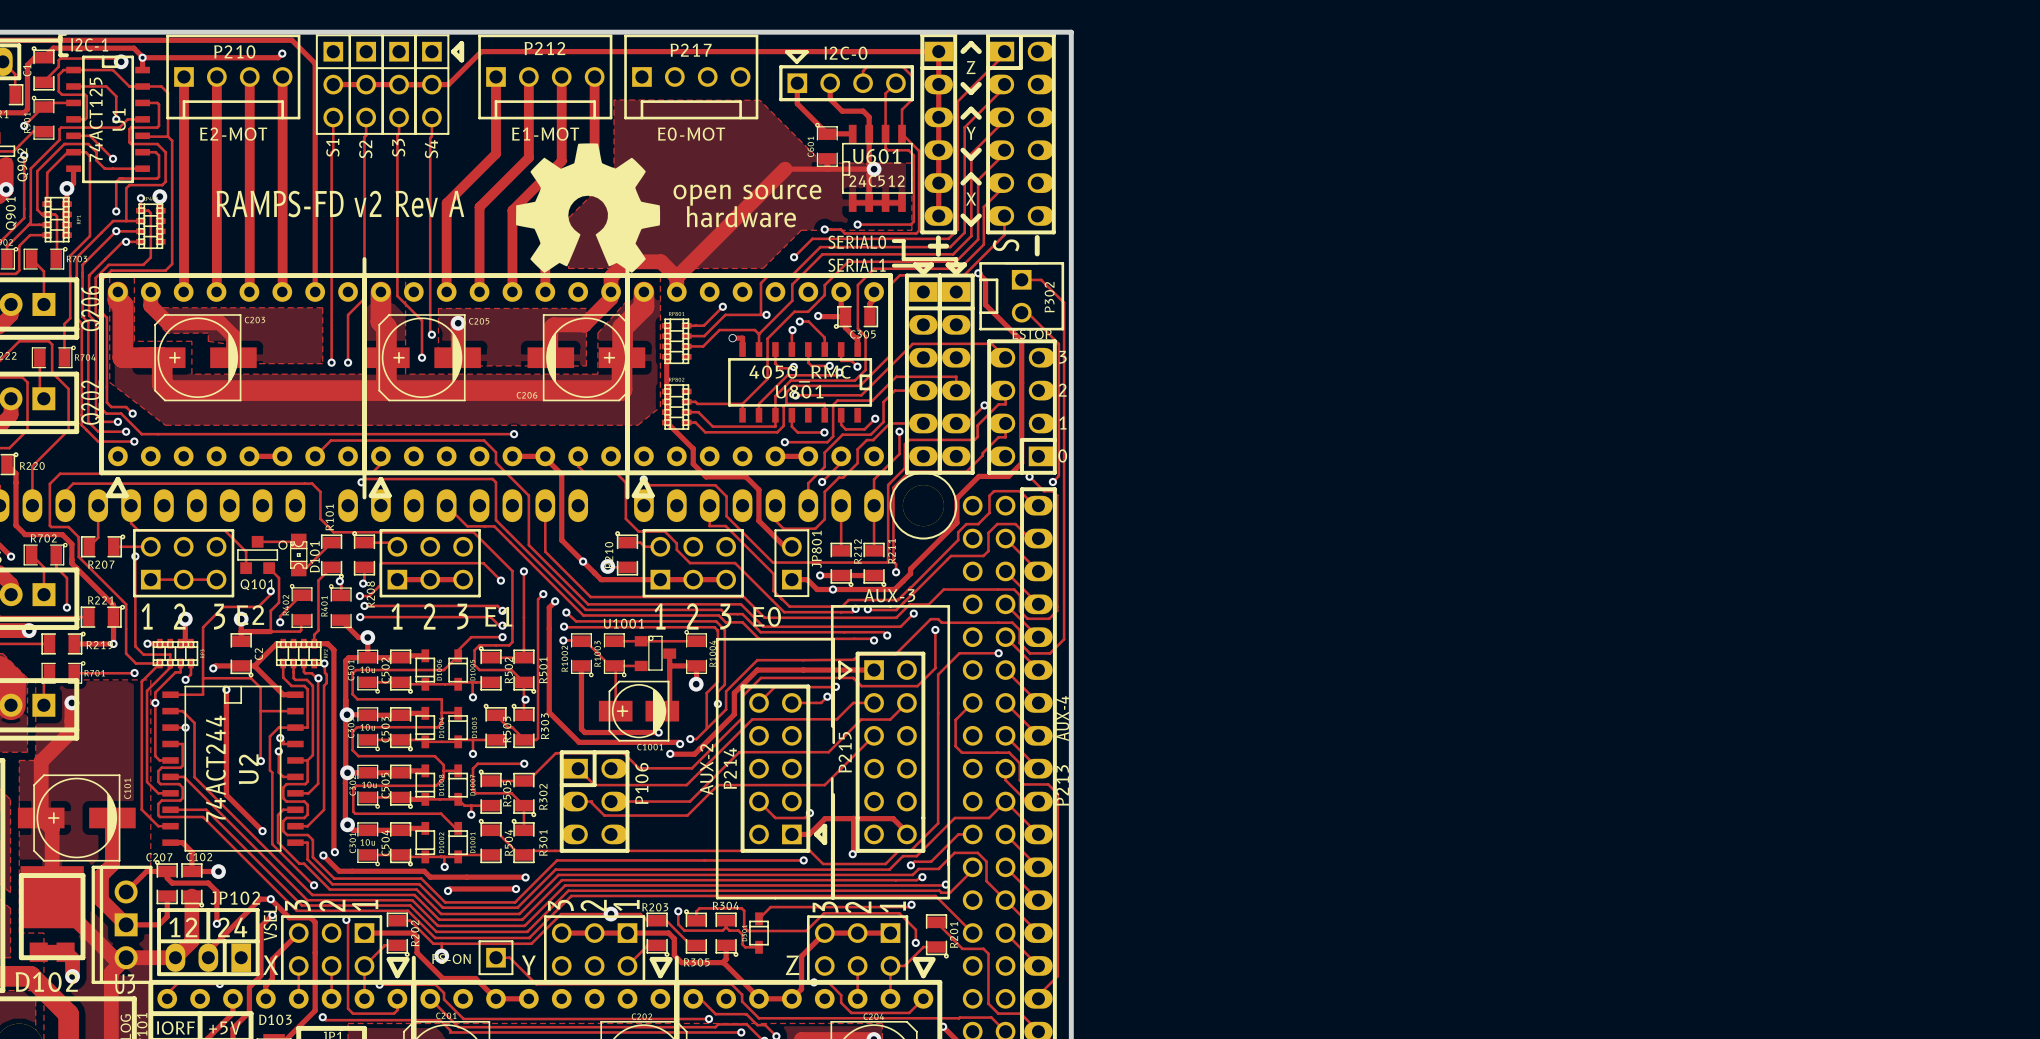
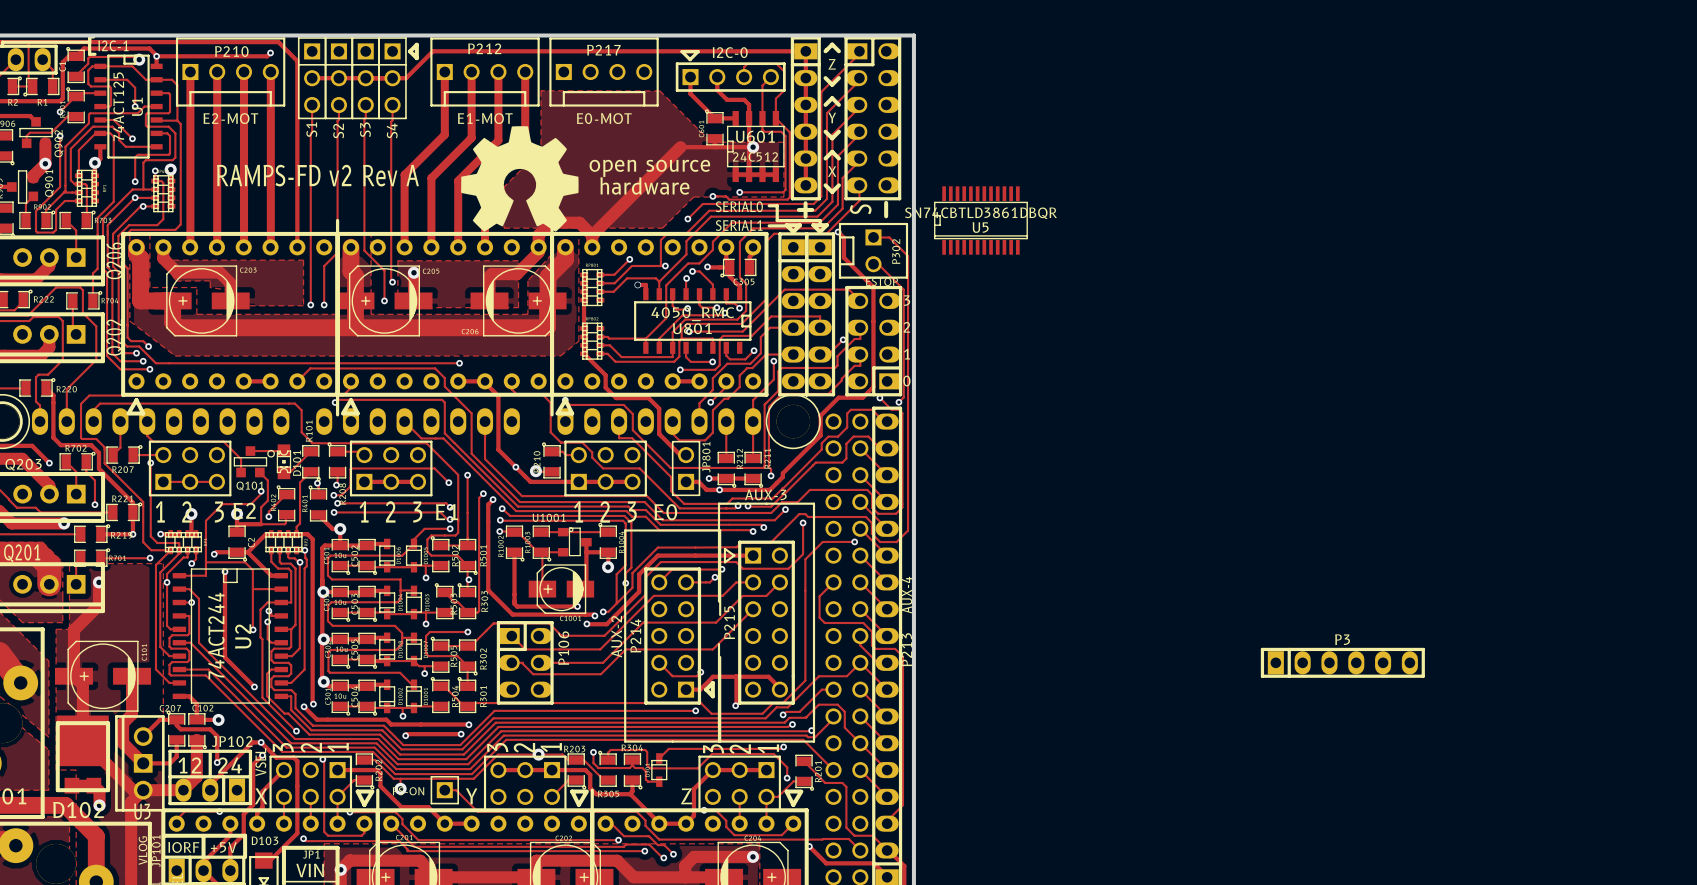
U5: none -> SN74CBTLD3861DBQR (980, 220)
P3: none -> (1342, 662)

